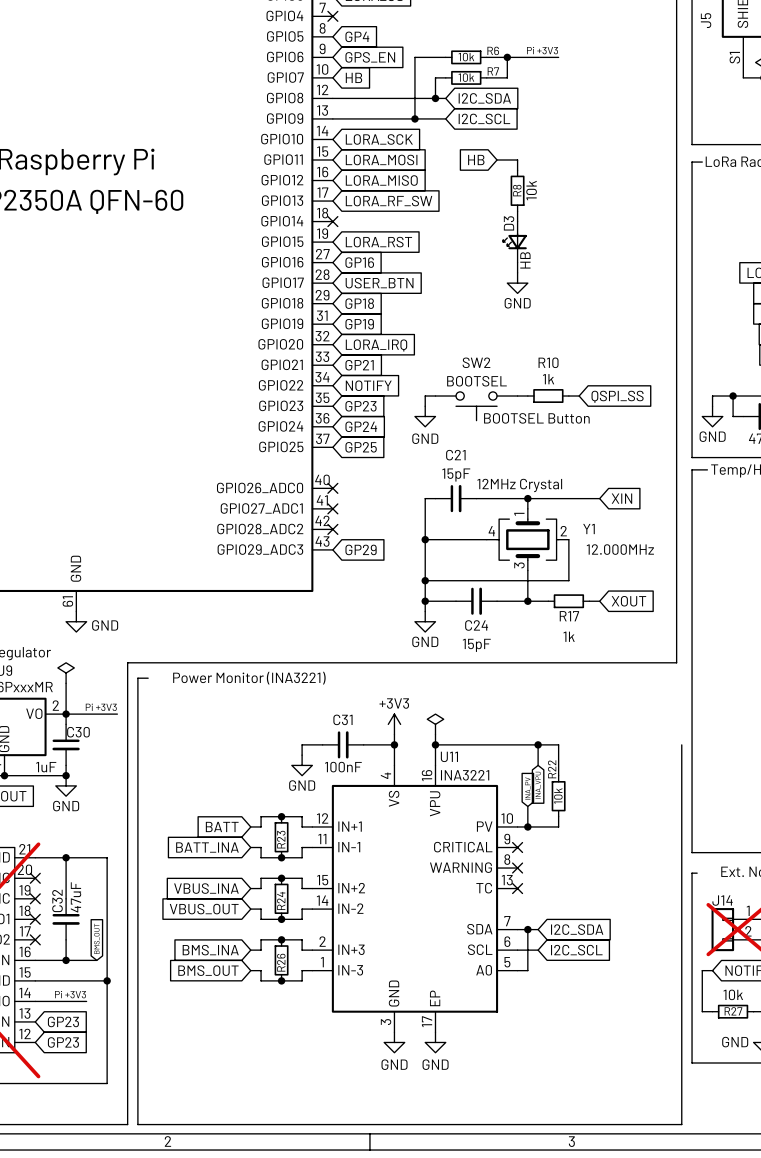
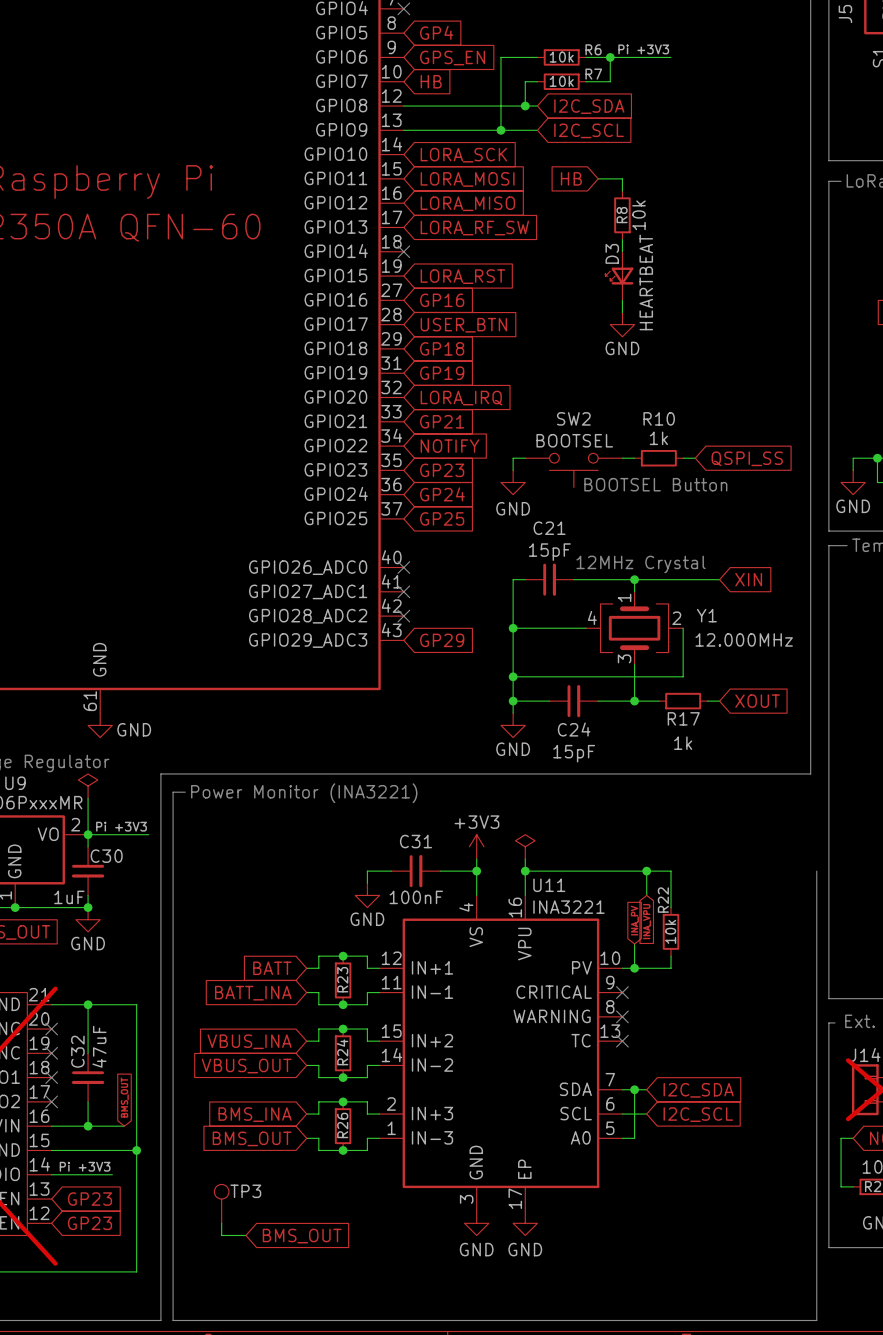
D3 value: HB (525, 260) -> HEARTBEAT (646, 282)
TP3: none -> (221, 1203)
wire: none -> (221, 1223) (221, 1235) (245, 1235)
global label: none -> BMS_OUT (302, 1236)

